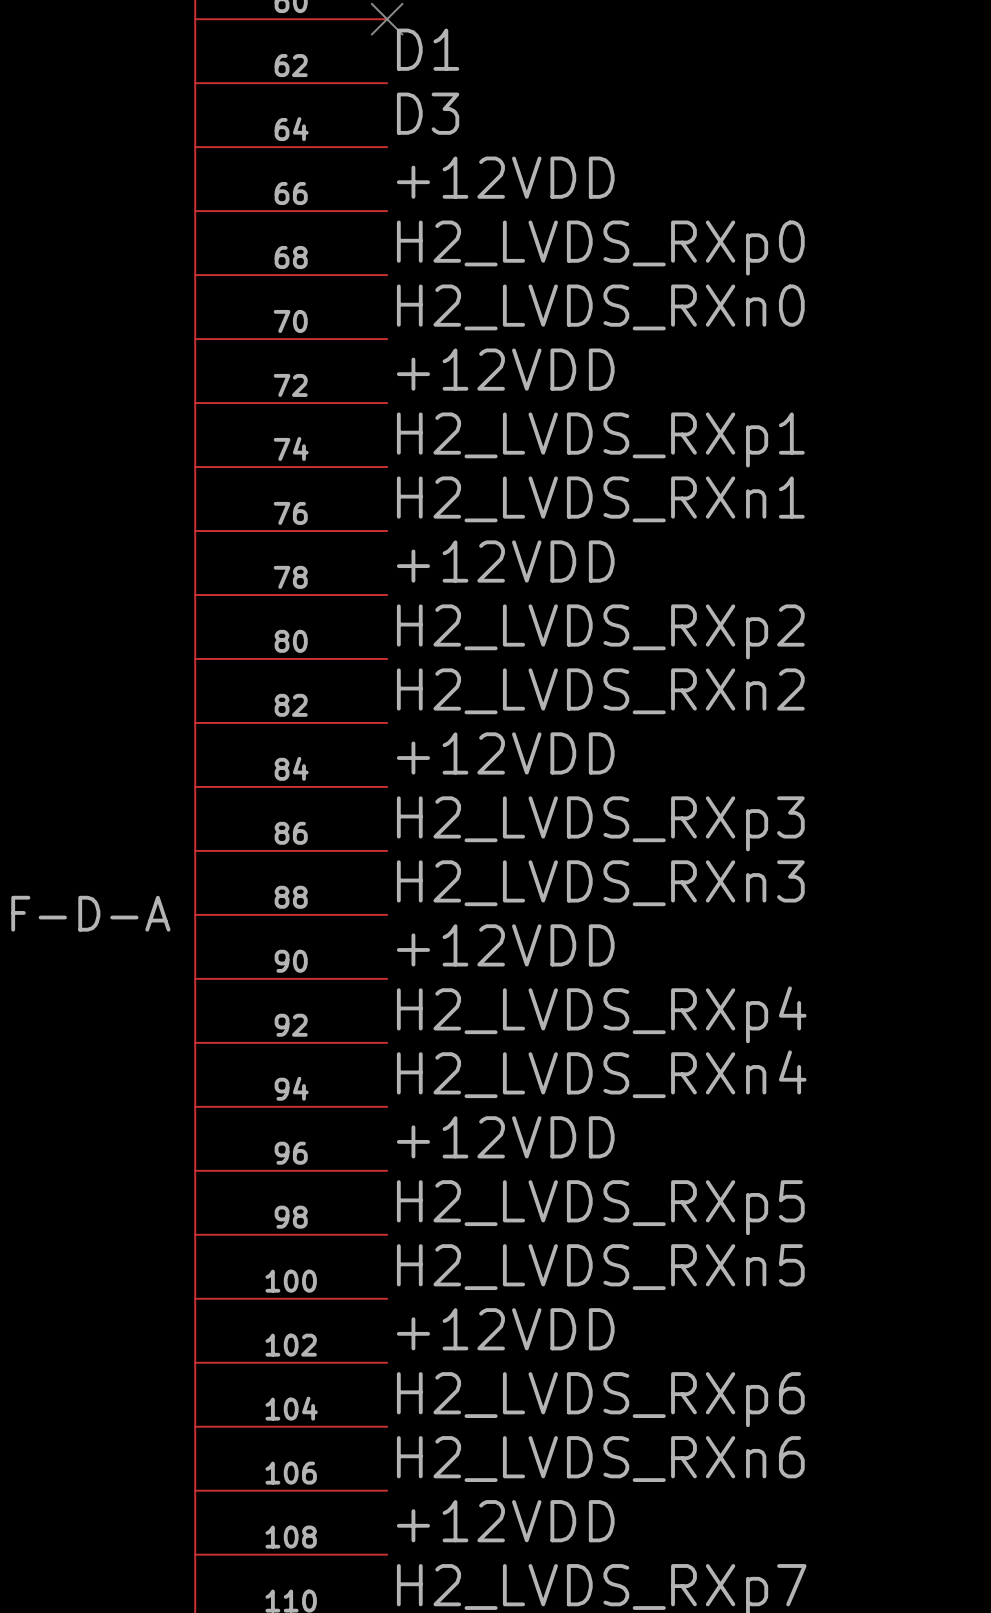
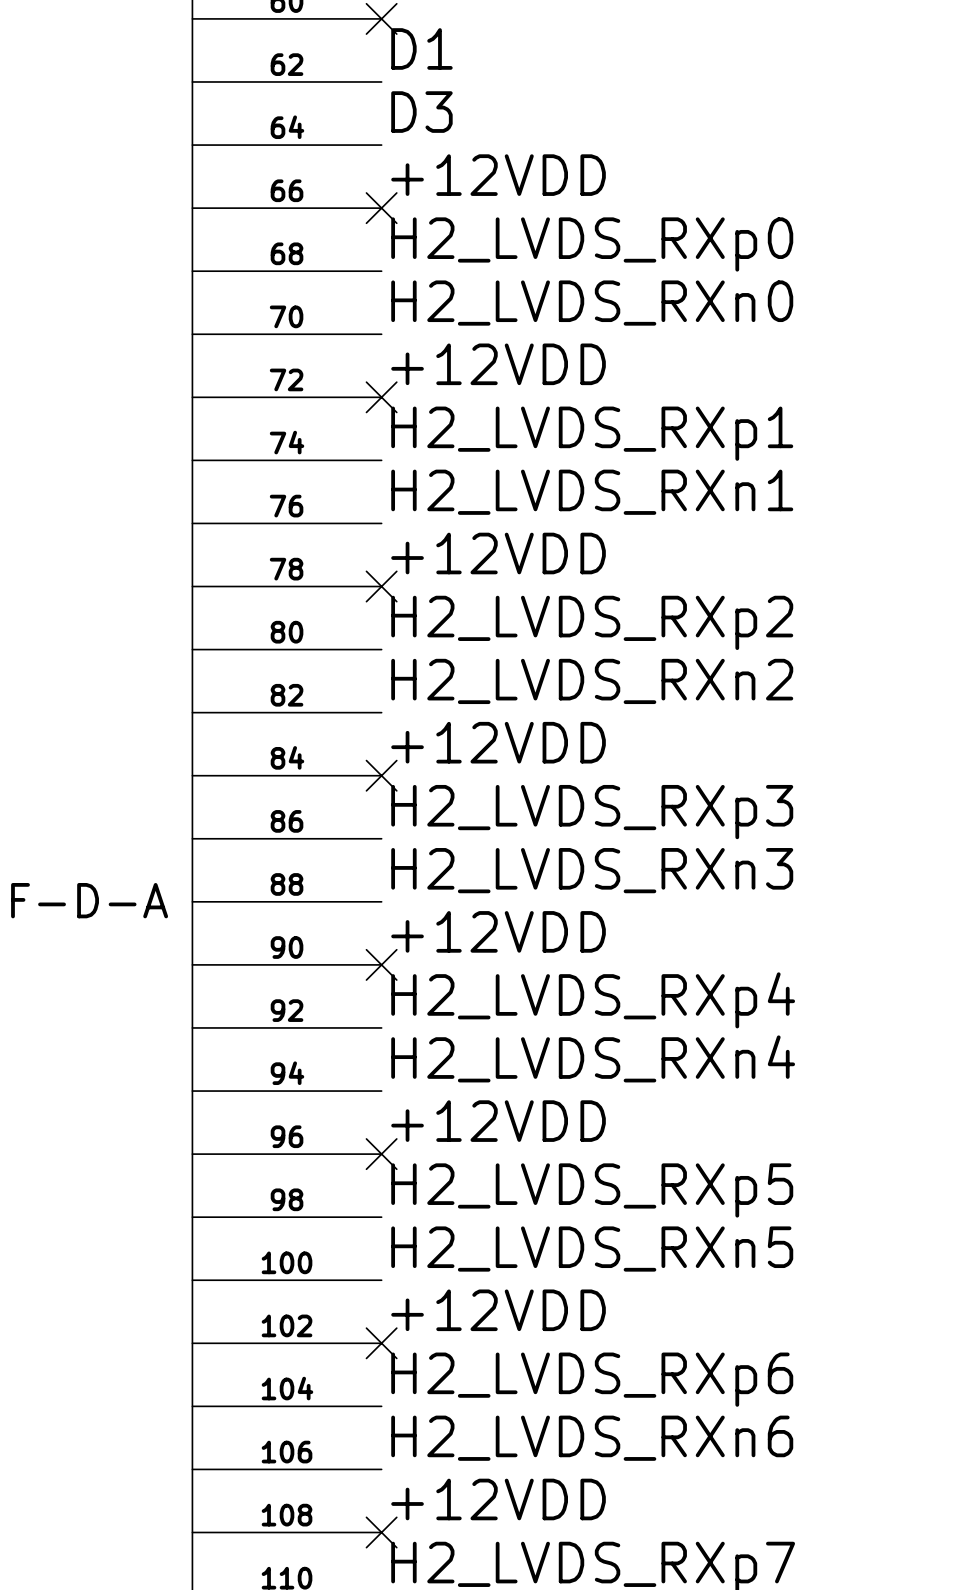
no-connect mark: none -> (381, 208)
no-connect mark: none -> (381, 397)
no-connect mark: none -> (381, 586)
no-connect mark: none -> (381, 775)
no-connect mark: none -> (381, 964)
no-connect mark: none -> (381, 1154)
no-connect mark: none -> (381, 1343)
no-connect mark: none -> (381, 1532)

